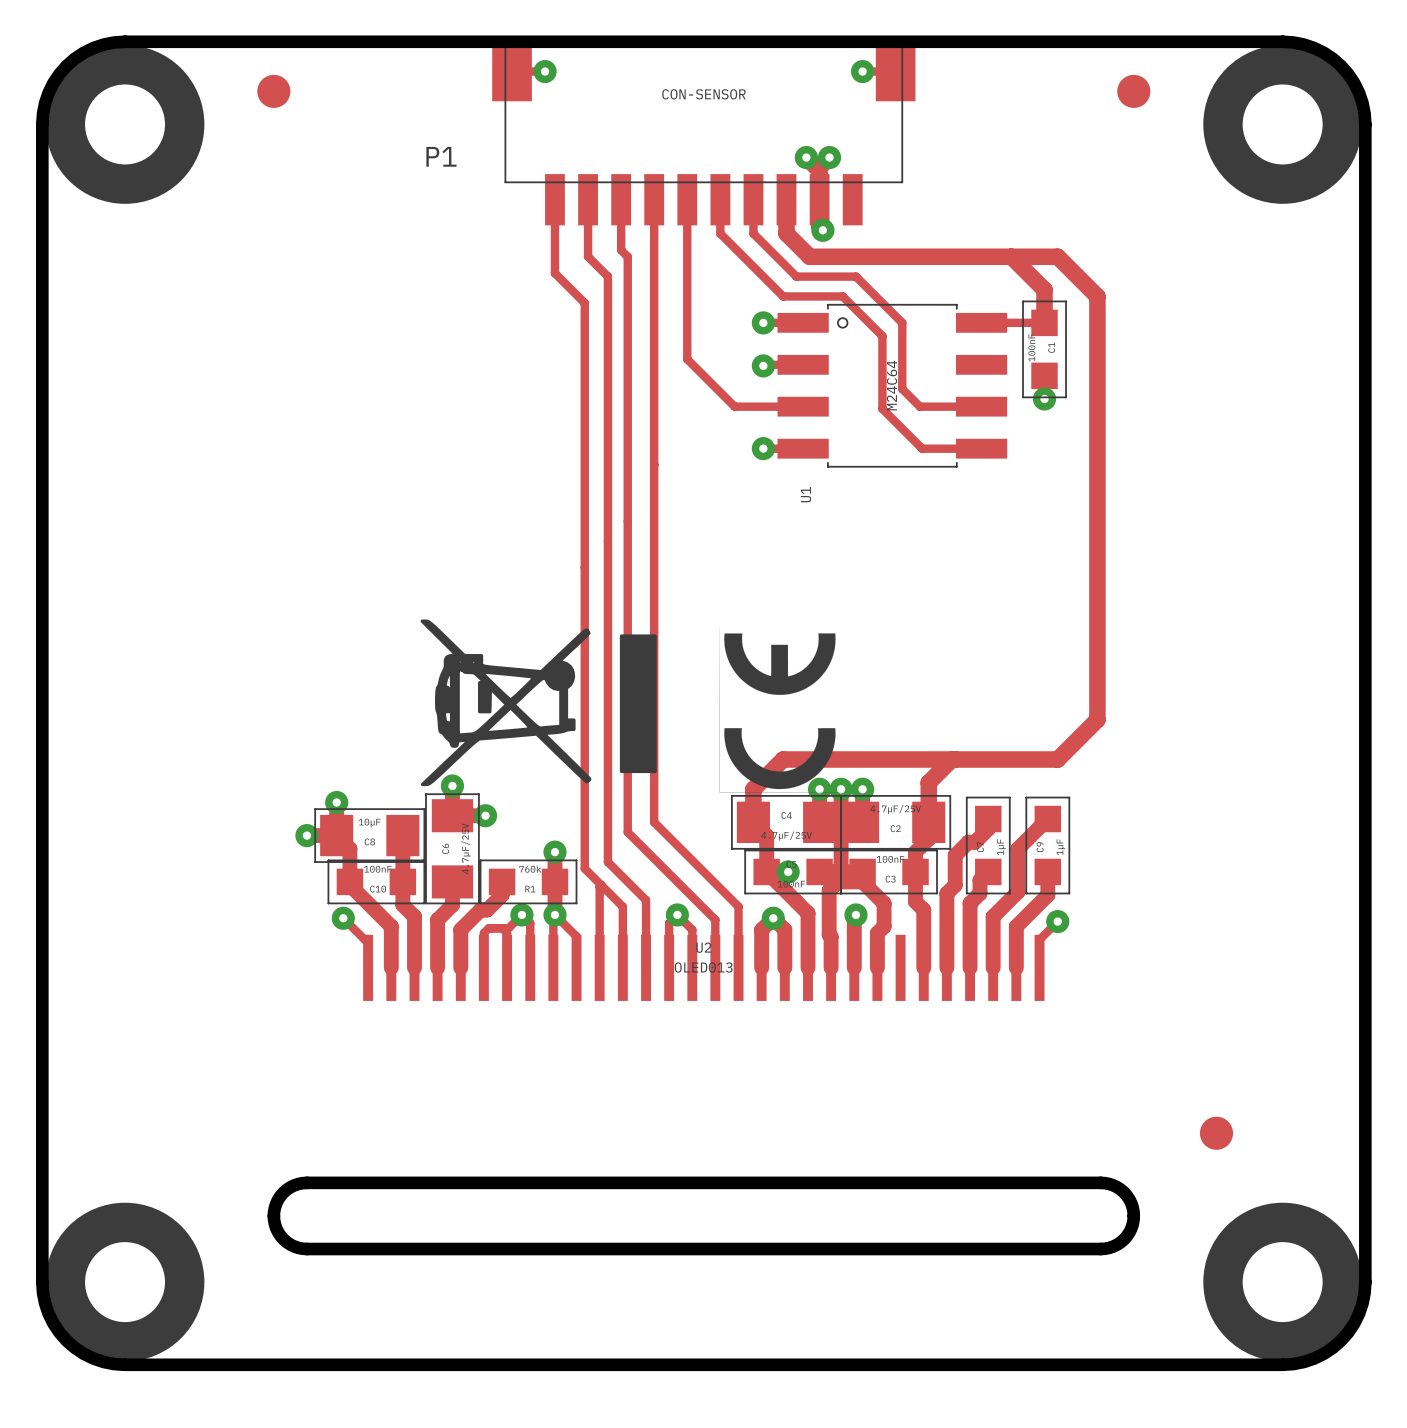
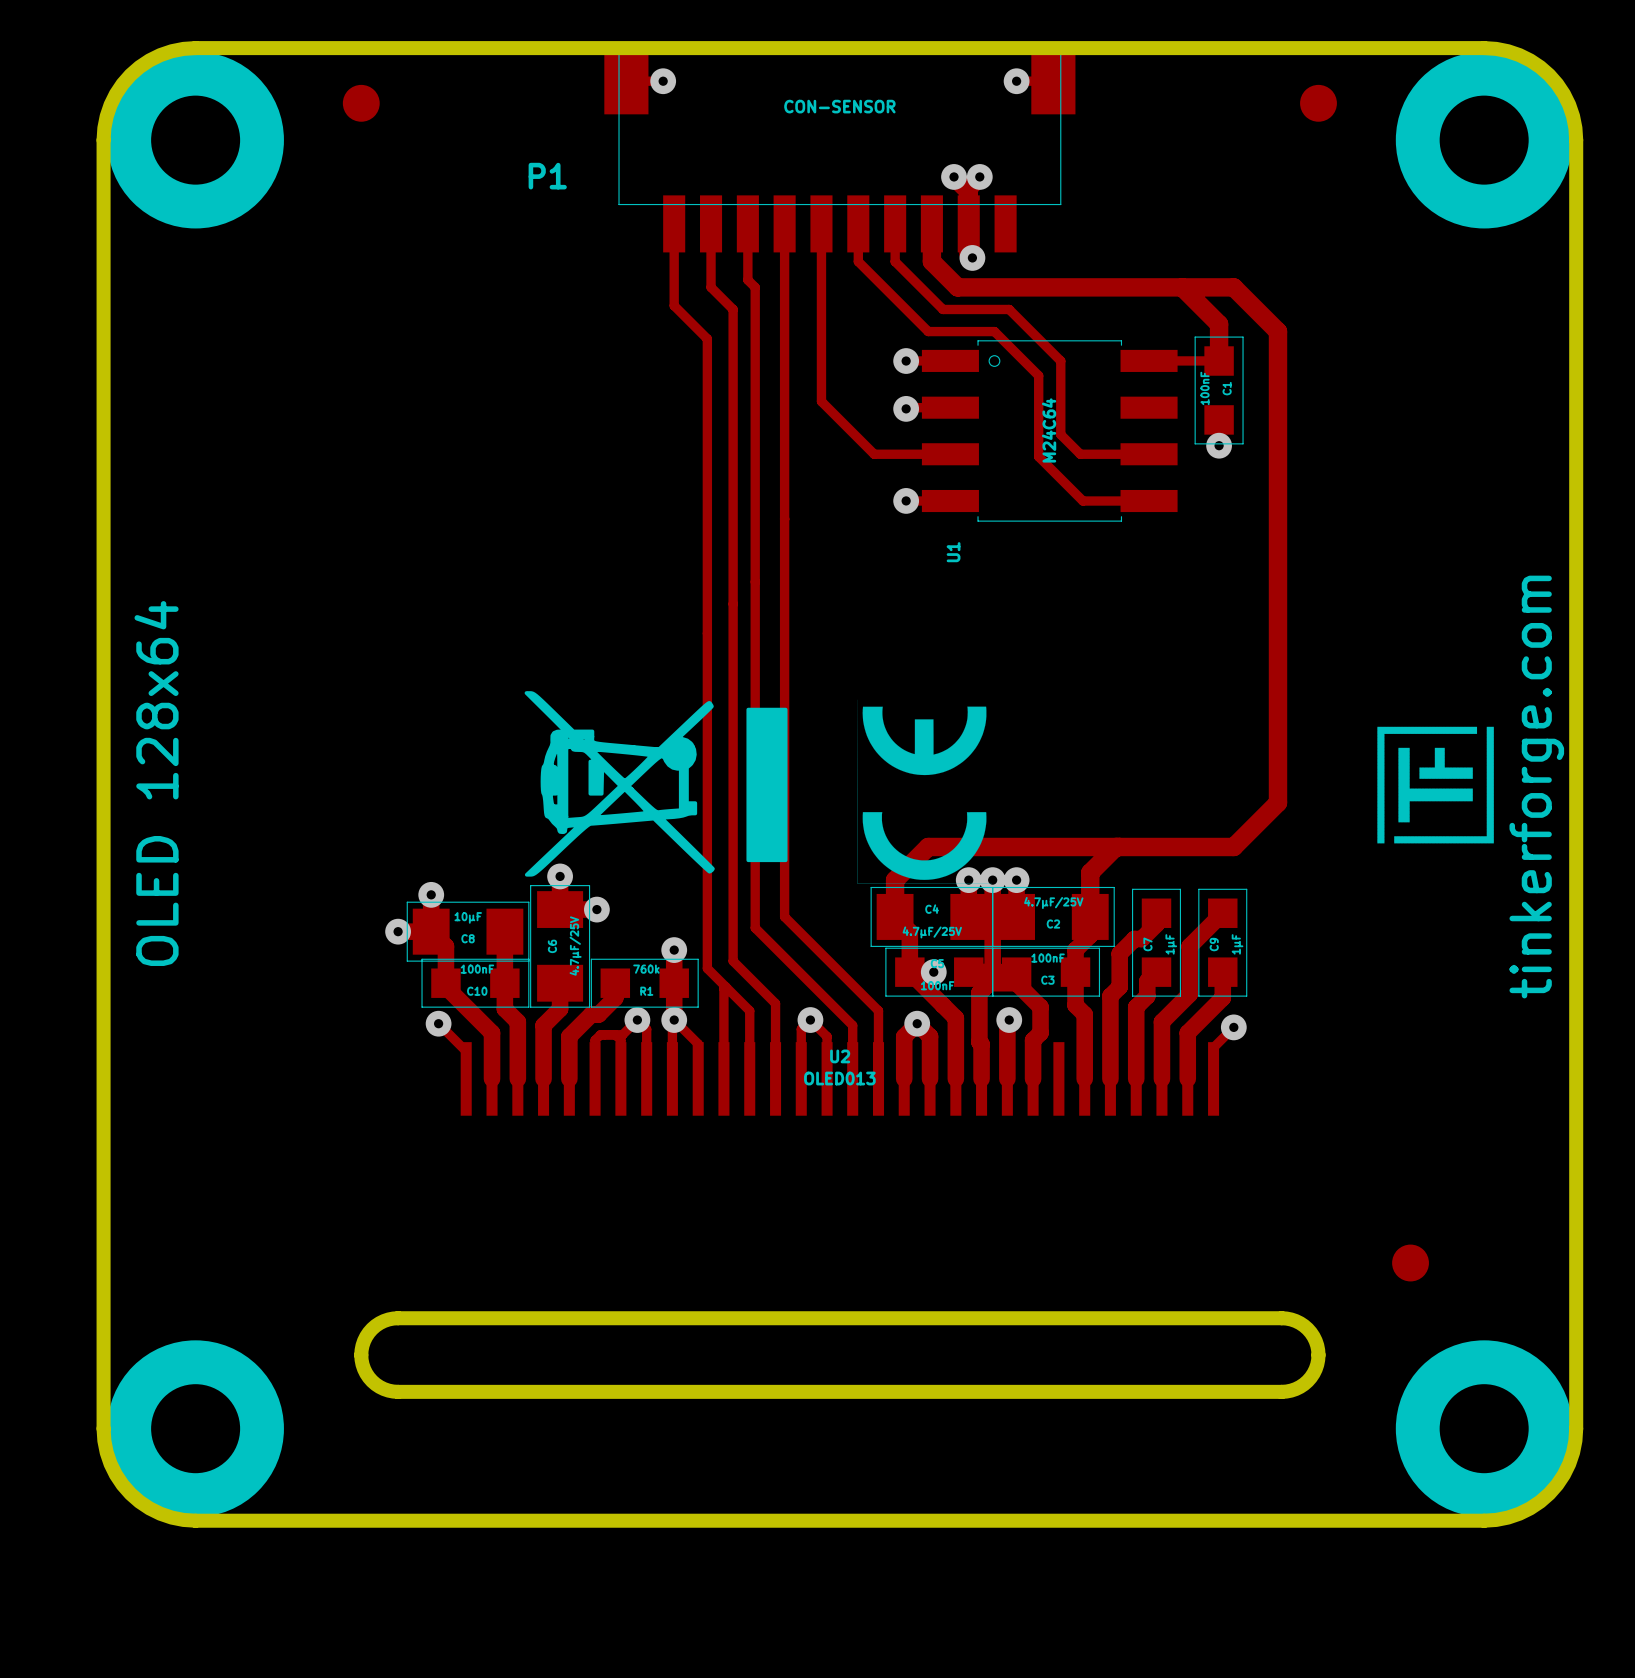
drawing: none -> [1377, 726, 1494, 844]
text: none -> OLED 128x64 (156, 783)
text: none -> tinkerforge.com (1536, 787)

